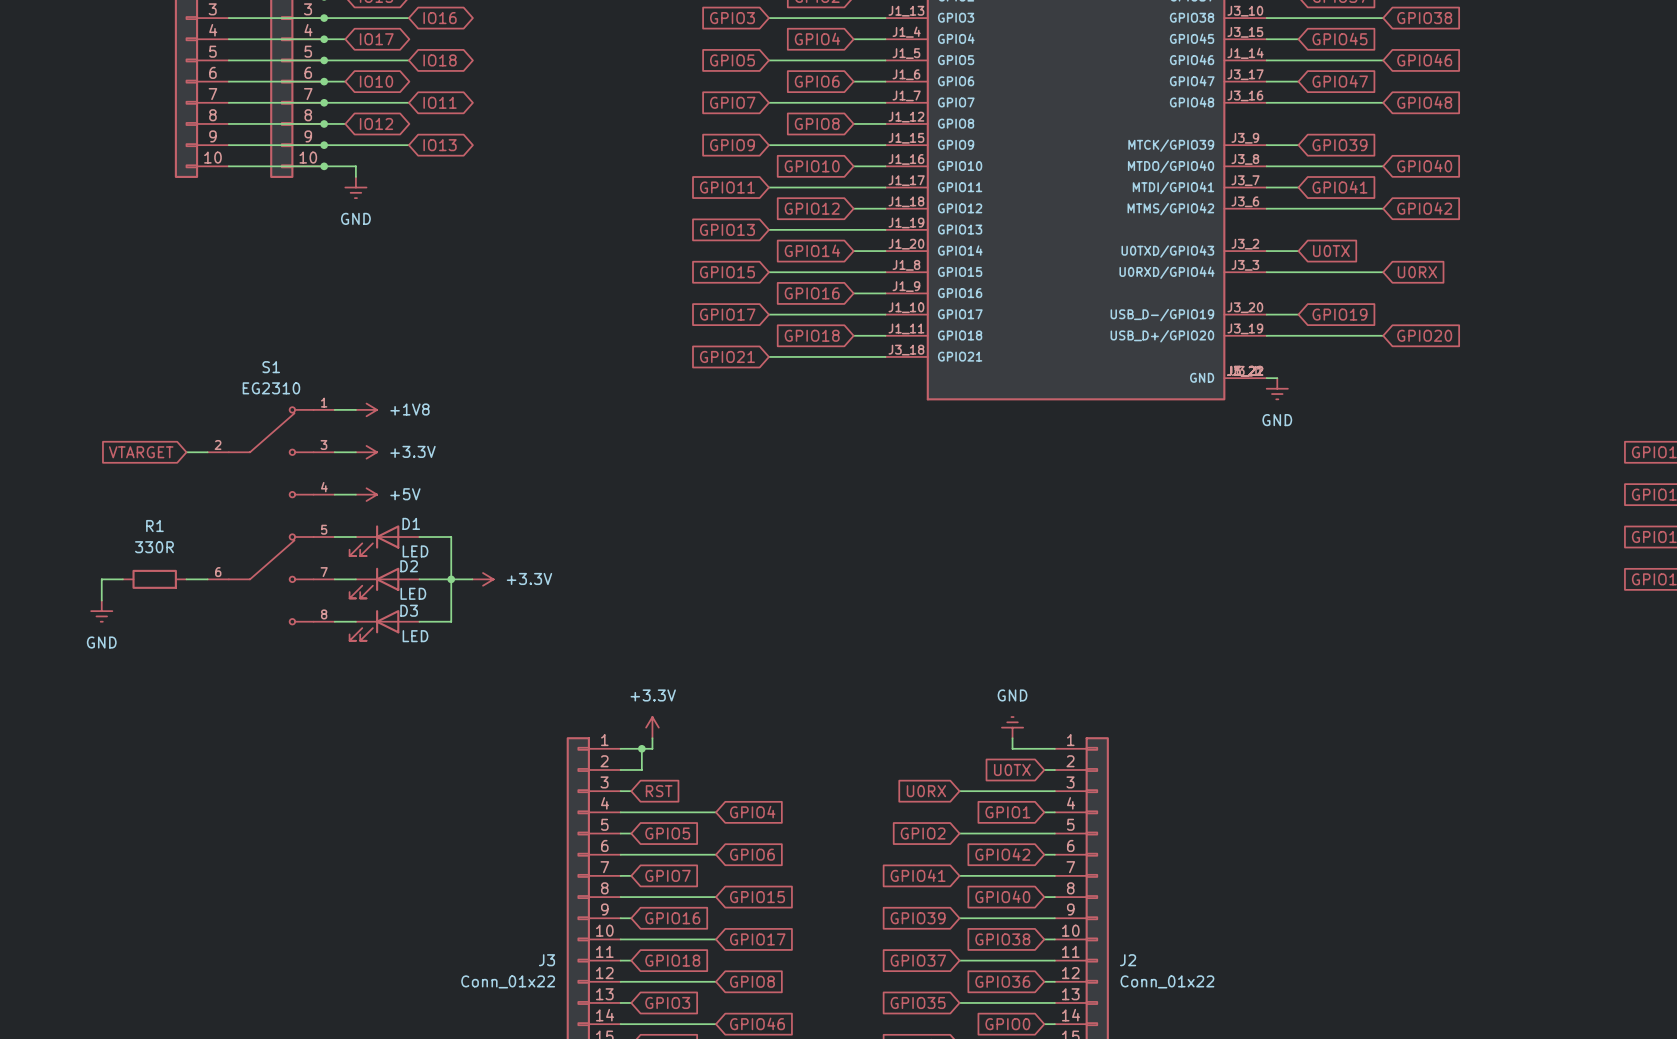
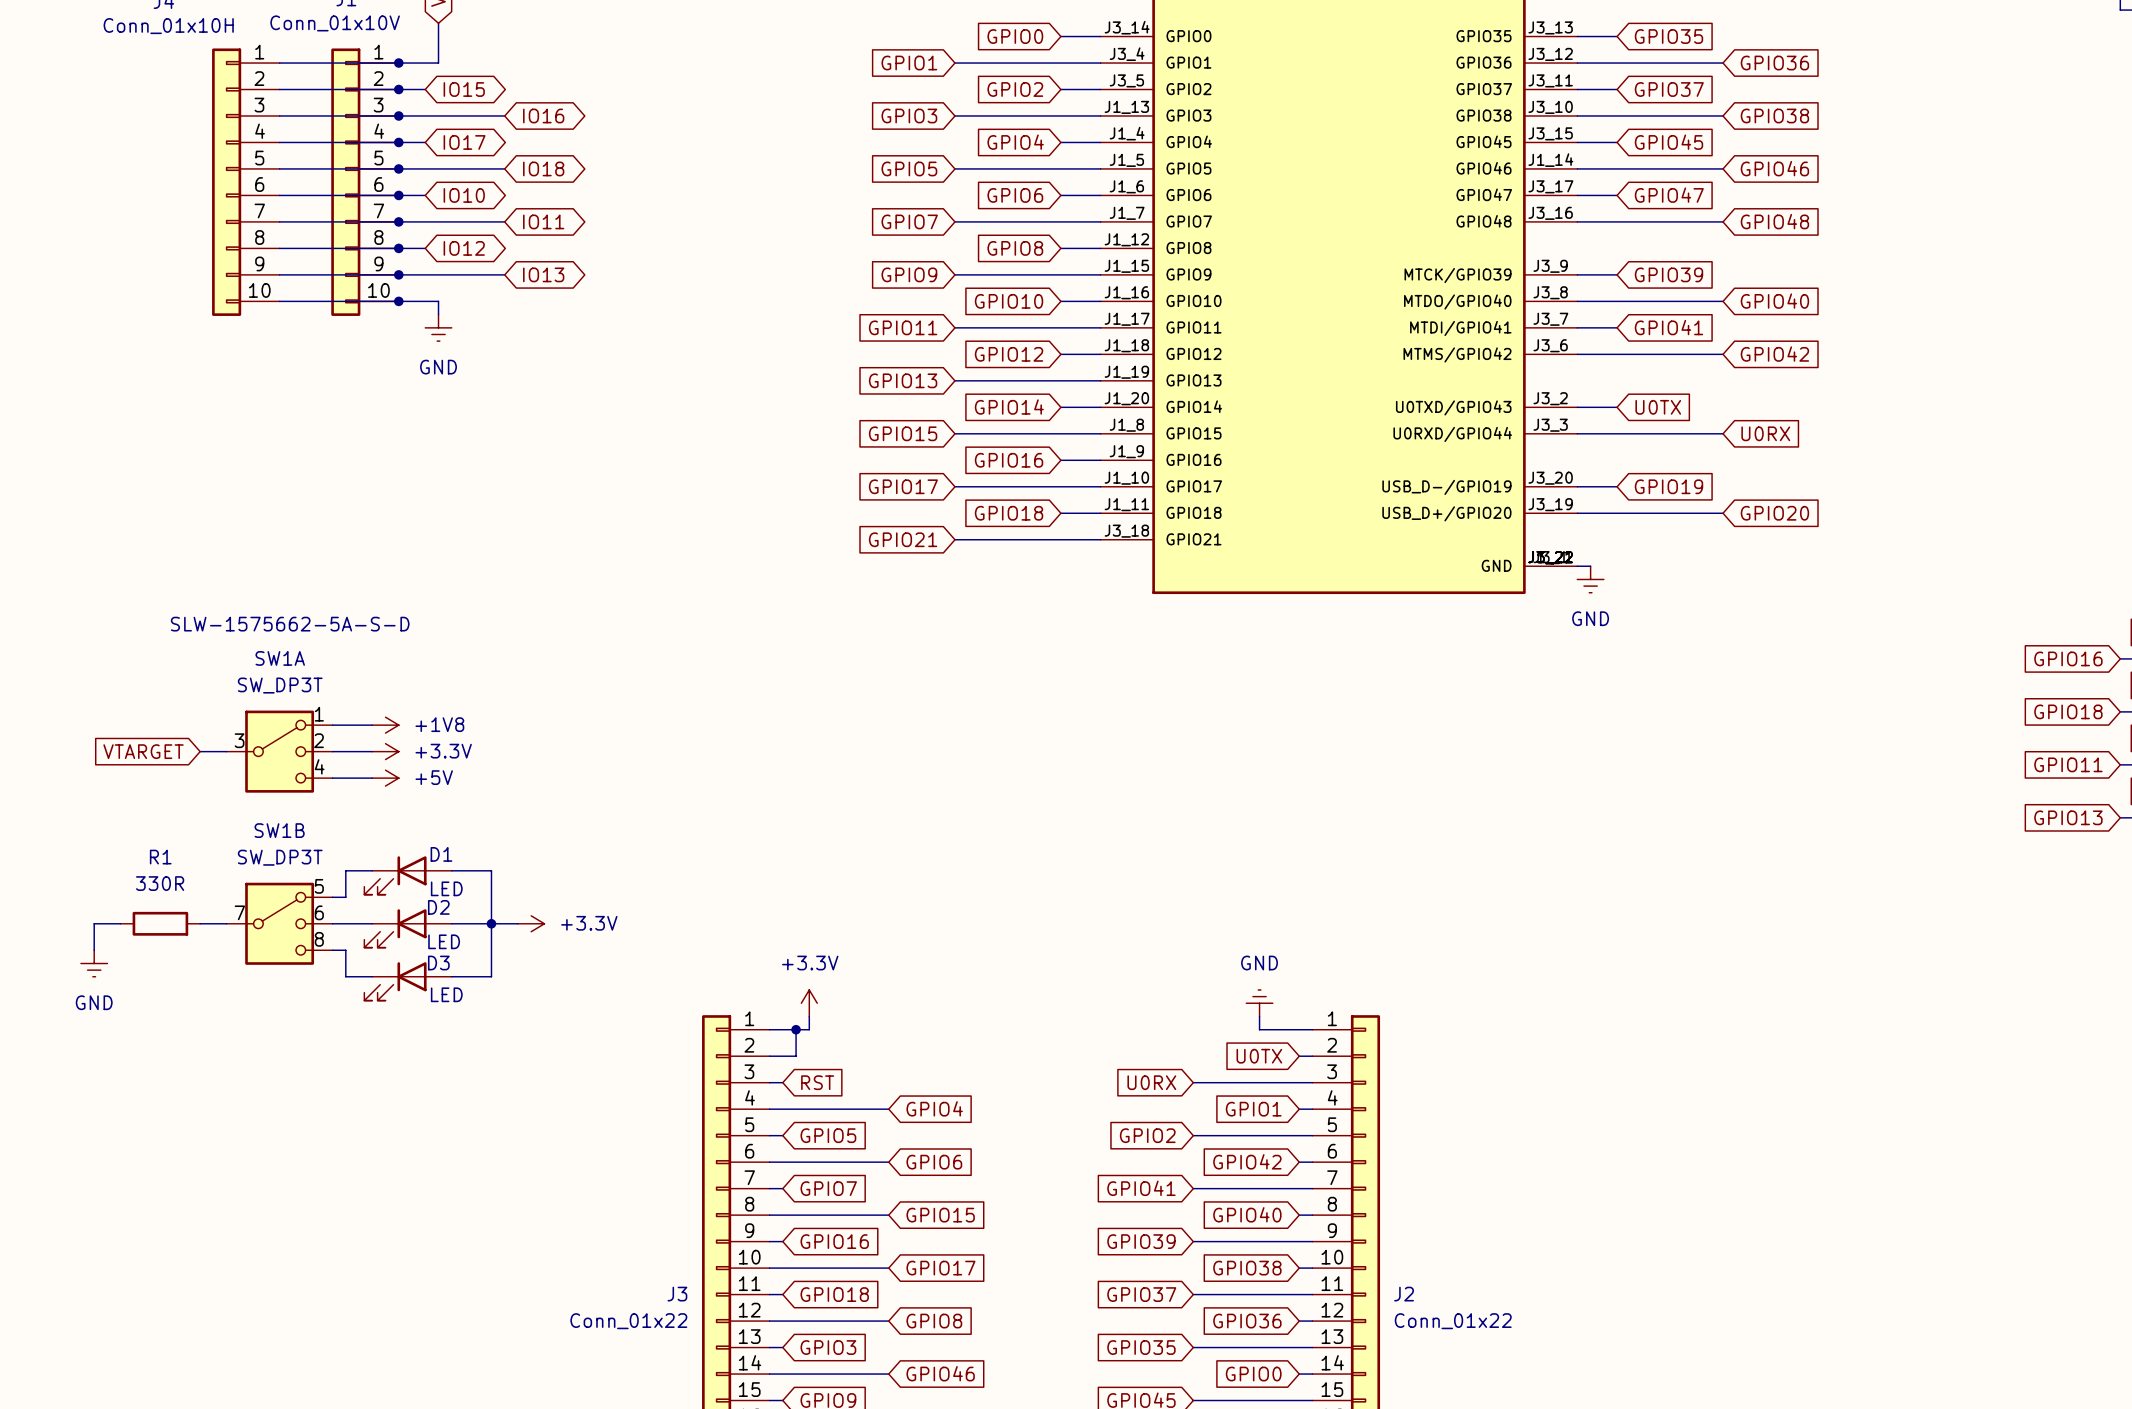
wire: (334, 409) (355, 409) -> none
power symbol position: +1V8 (366, 409) -> +1V8 (385, 725)
text: none -> SLW-1575662-5A-S-D (290, 624)
global label position: VTARGET (141, 452) -> VTARGET (143, 751)
wire: (186, 452) (207, 452) -> (200, 751) (226, 751)
wire: (334, 452) (355, 452) -> none
power symbol: +3.3V (366, 452) -> none
wire: (334, 494) (355, 494) -> none
power symbol position: +5V (366, 494) -> +5V (385, 778)
wire: none -> (332, 725) (372, 725)
S1: EG2310 (271, 515) -> none
SW1A: none -> SW_DP3T (279, 751)
wire: none -> (332, 751) (372, 751)
power symbol: none -> +3.3V (385, 751)
wire: (334, 537) (355, 537) -> none
wire: (419, 537) (451, 537) (451, 621) (419, 621) -> (451, 870) (491, 870) (491, 976) (451, 976)
D1 position: (384, 540) -> (408, 875)
wire: none -> (332, 778) (372, 778)
wire: (122, 579) (101, 579) (101, 600) -> (120, 923) (94, 923) (94, 950)
R1 position: (154, 579) -> (160, 923)
wire: (186, 579) (207, 579) -> (200, 923) (226, 923)
wire: (334, 579) (355, 579) -> none
wire: (419, 579) (472, 579) -> (451, 923) (517, 923)
junction: (451, 579) -> none
power symbol: +3.3V (483, 579) -> none
D2 position: (384, 583) -> (408, 928)
power symbol position: GND (101, 611) -> GND (94, 963)
wire: none -> (372, 870) (345, 870) (345, 897) (332, 897)
D3 position: (384, 625) -> (408, 981)
SW1B: none -> SW_DP3T (279, 923)
wire: none -> (332, 923) (372, 923)
junction: none -> (491, 923)
power symbol: none -> +3.3V (531, 923)
wire: none -> (332, 950) (345, 950) (345, 976) (372, 976)

